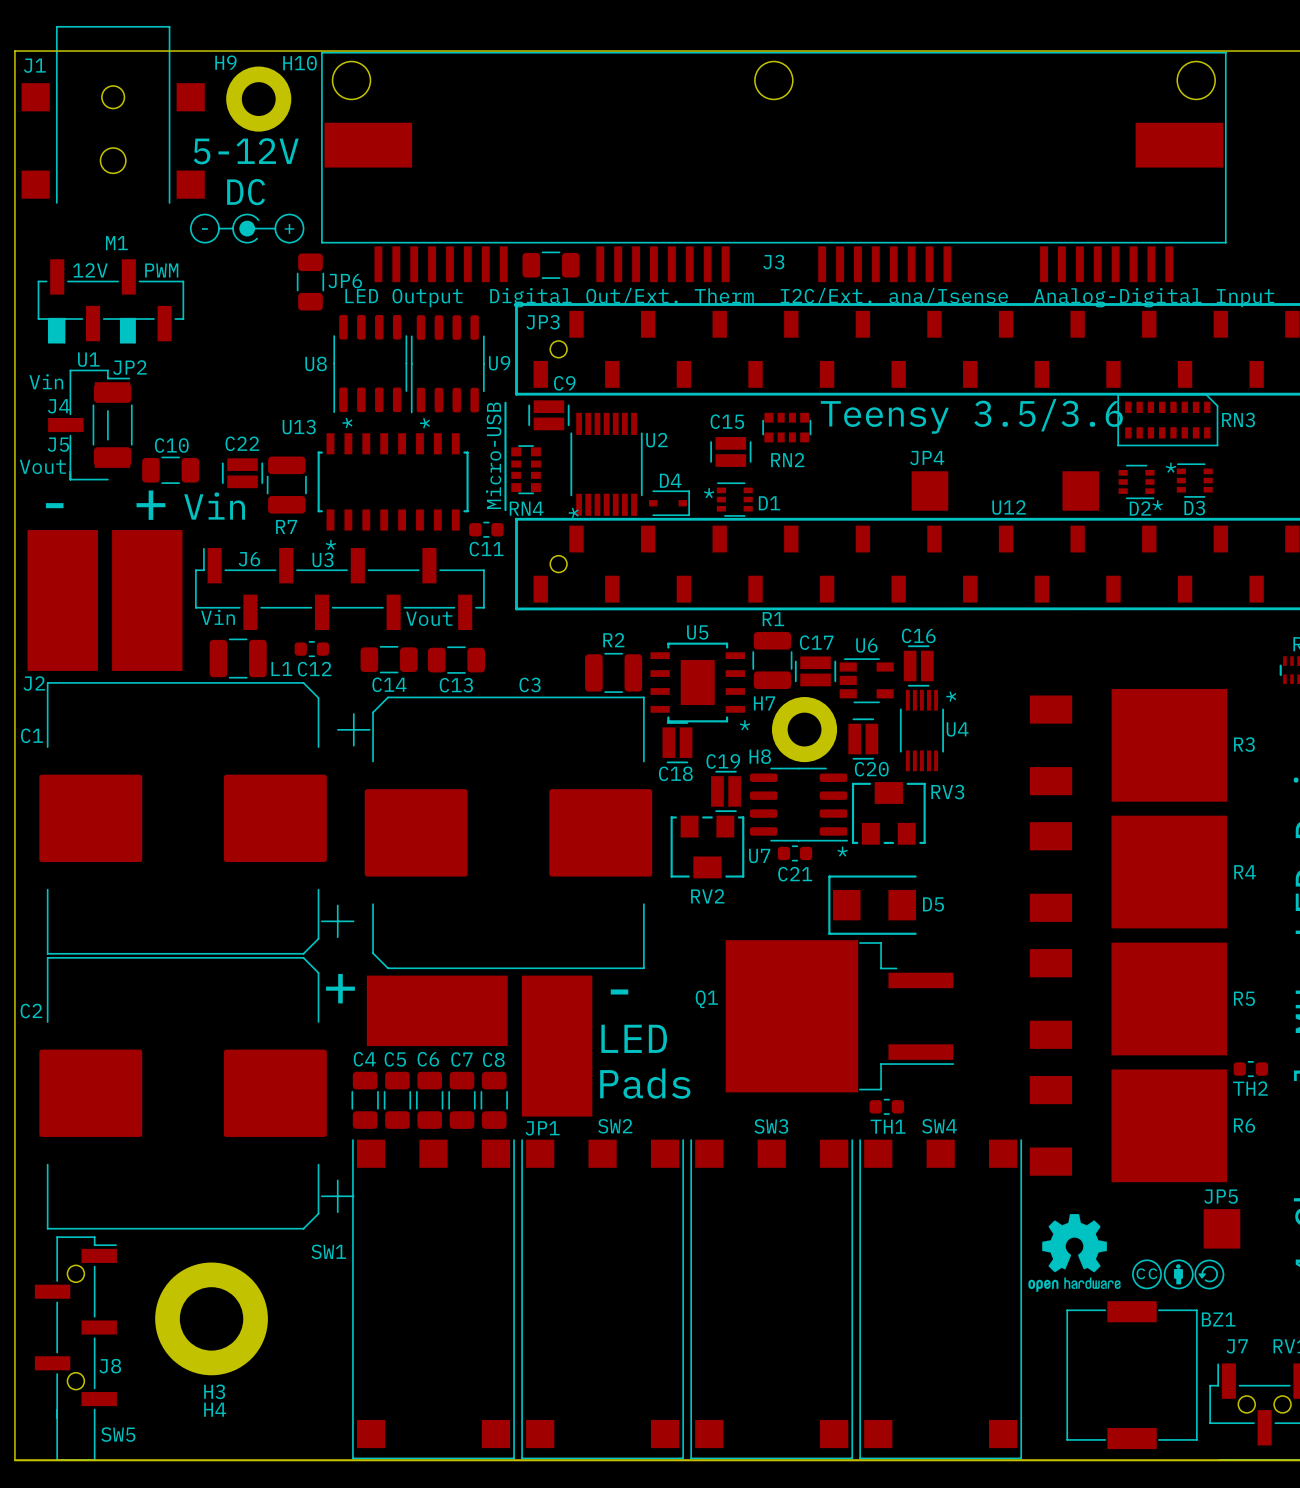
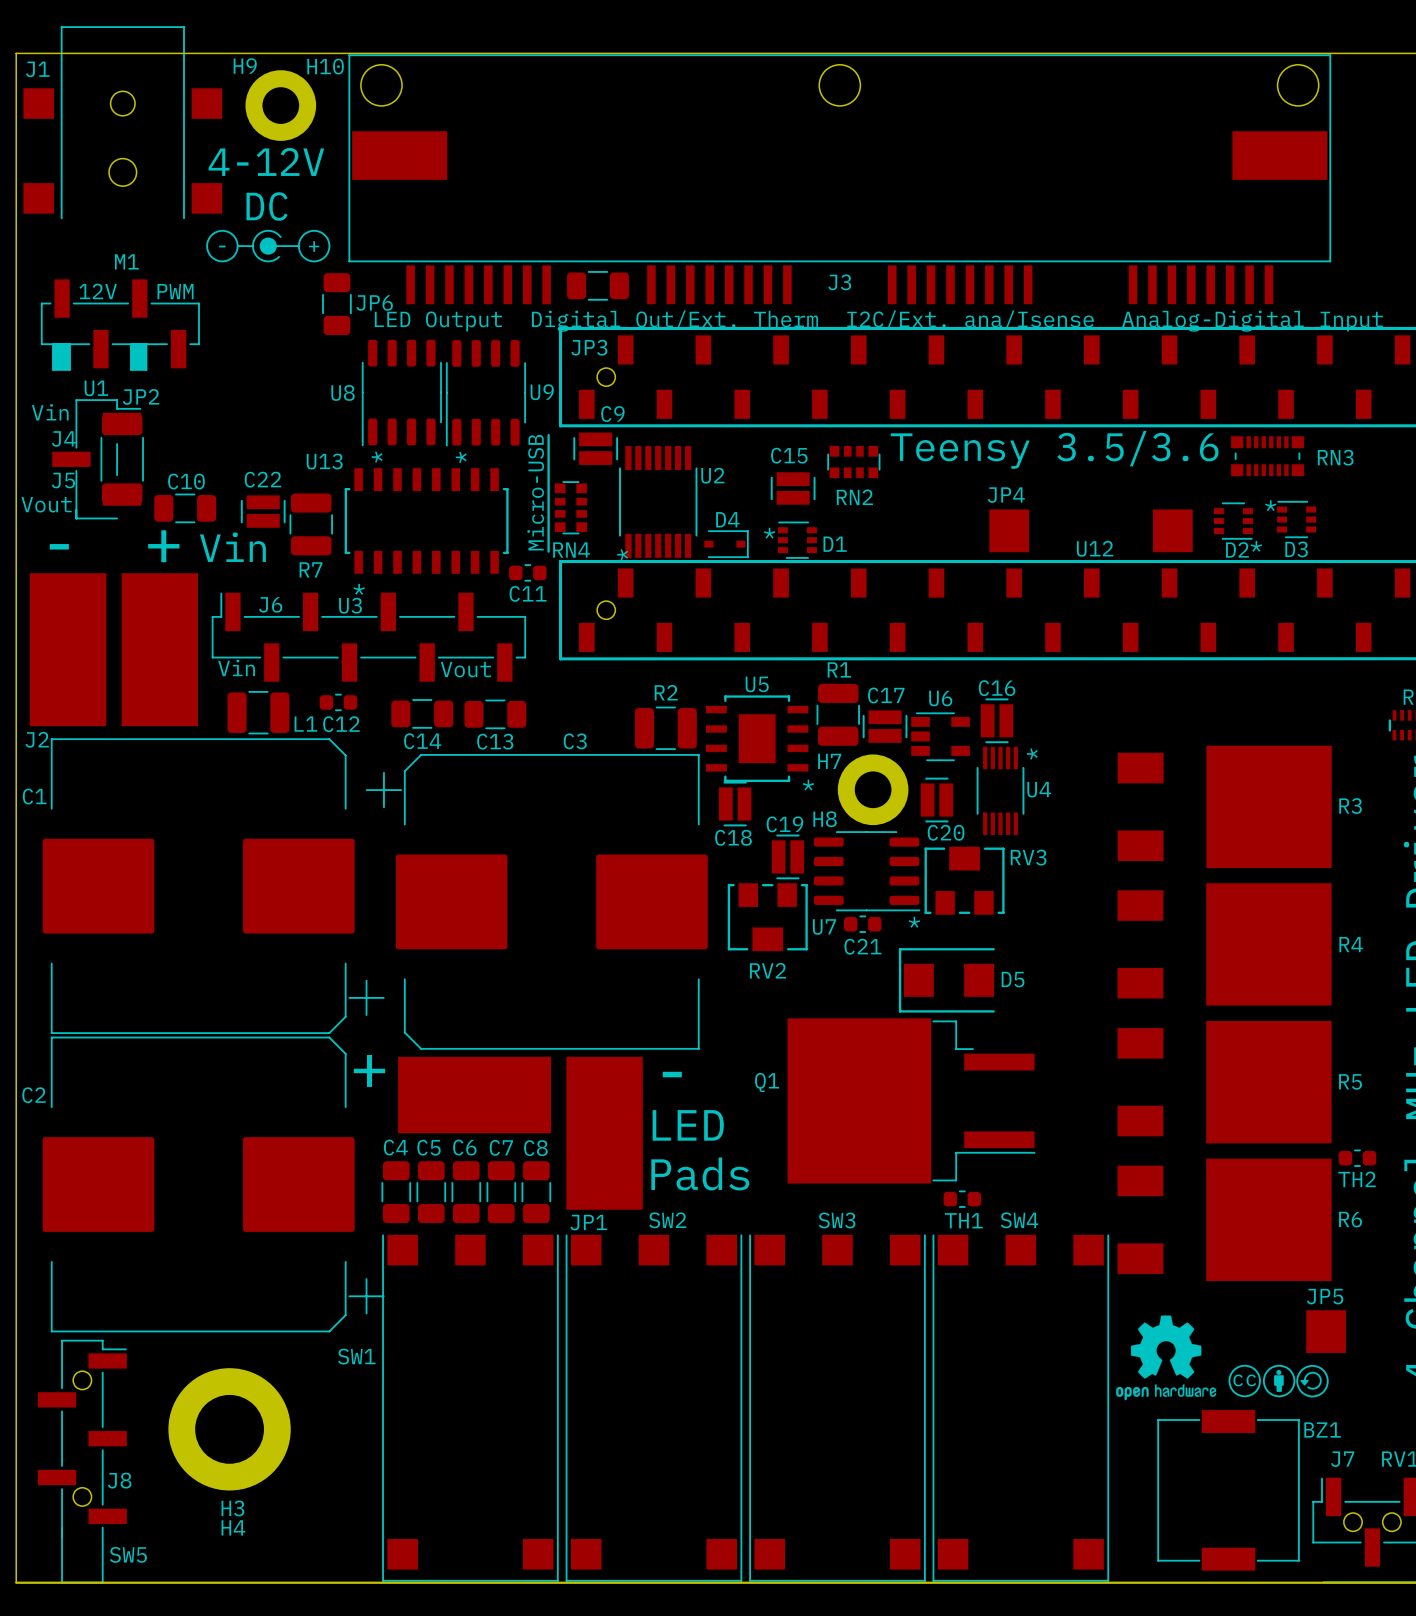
text: 5-12V (246, 151) -> 4-12V (266, 161)
RN3 footprint: [1117, 393, 1219, 447] -> [1231, 436, 1304, 477]

